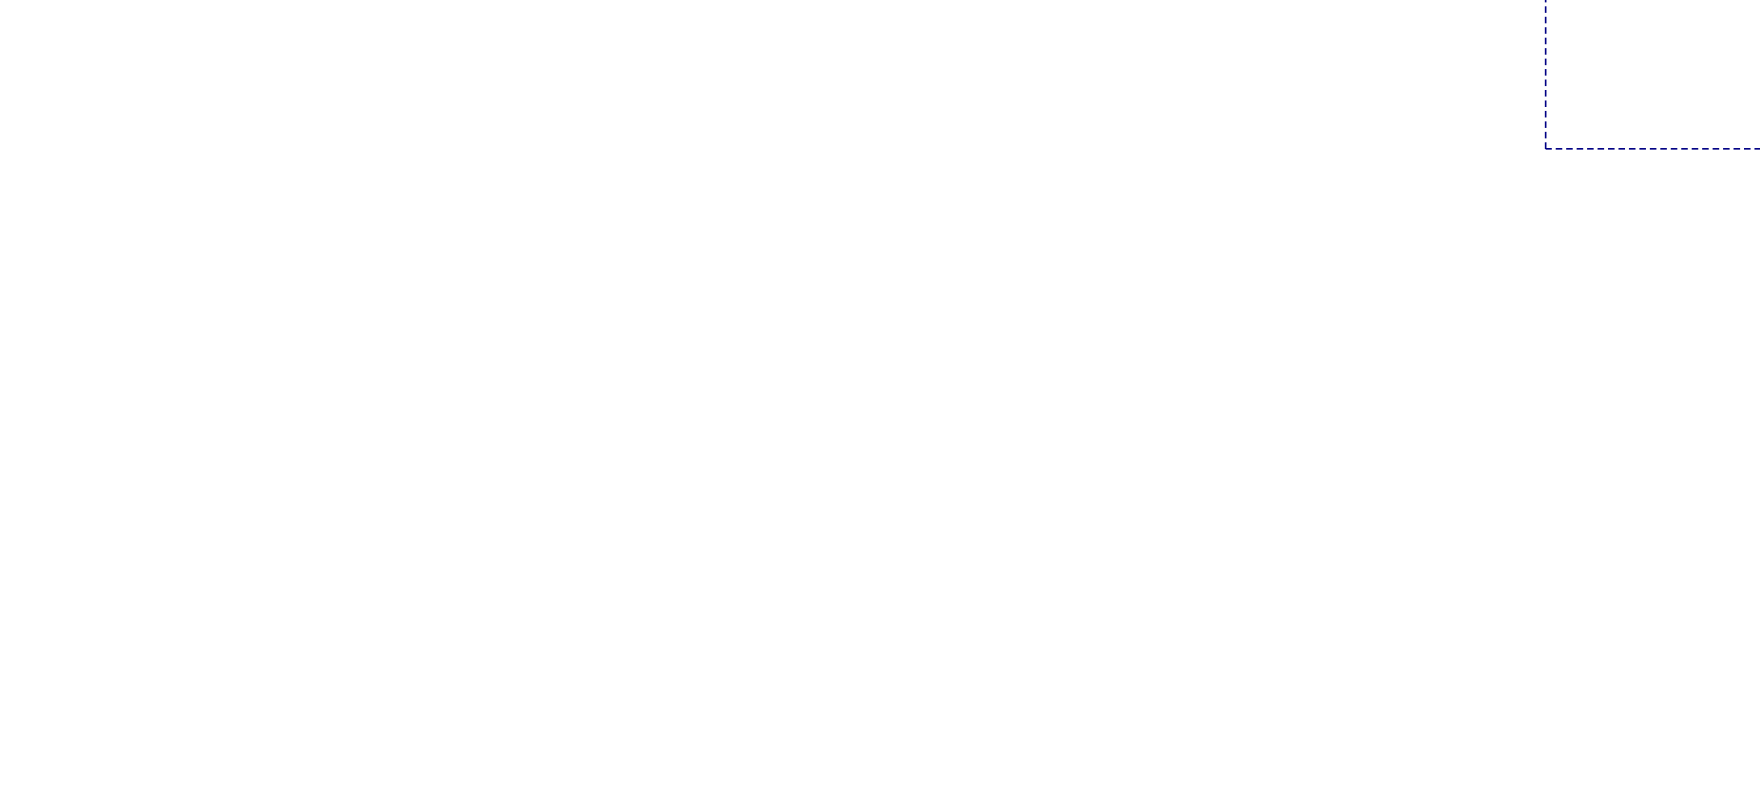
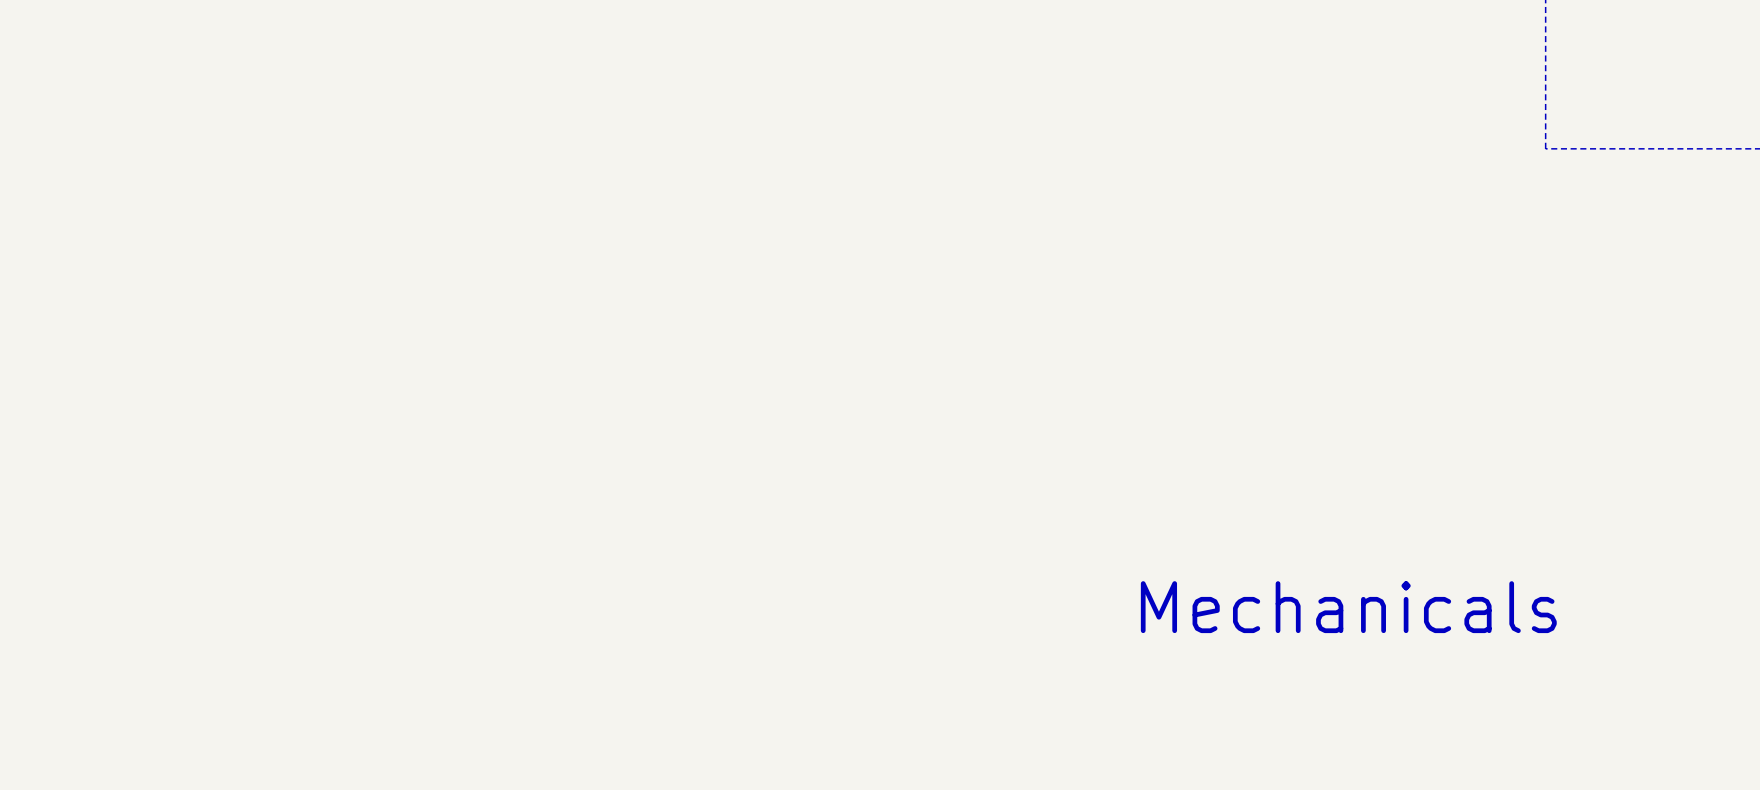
text: none -> Mechanicals (1348, 607)

